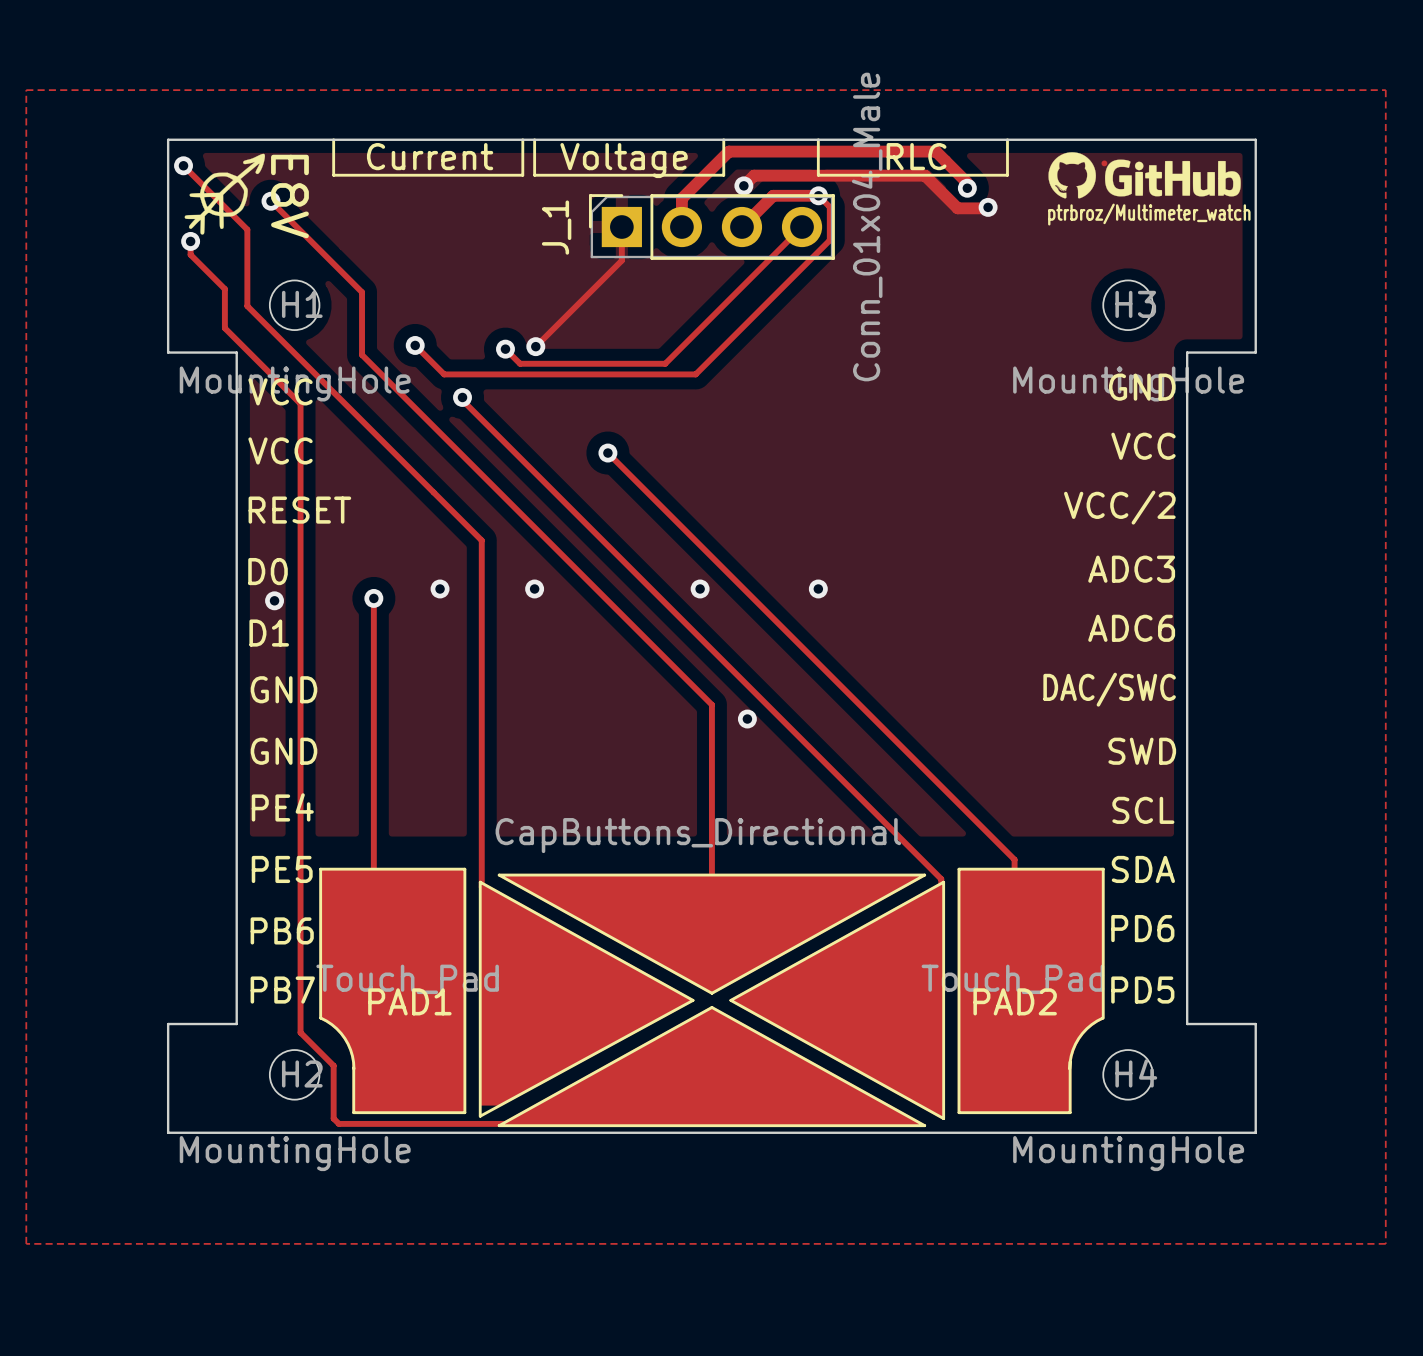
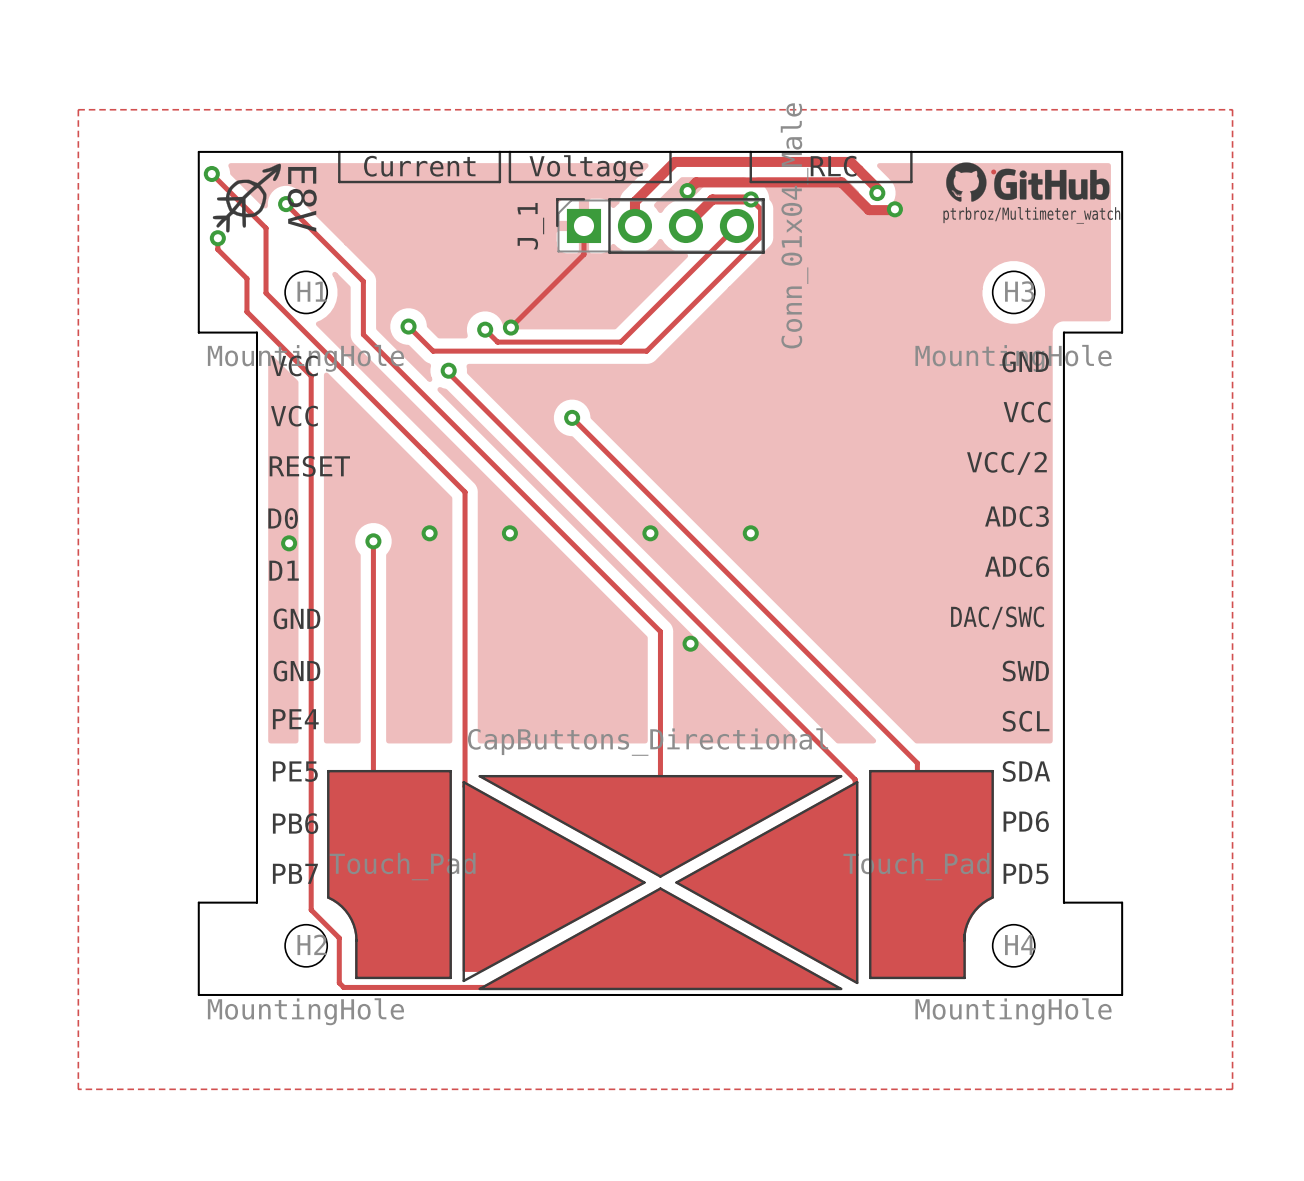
PAD1 name: PAD1 (409, 1001) -> none
PAD2 name: PAD2 (1015, 1001) -> none

